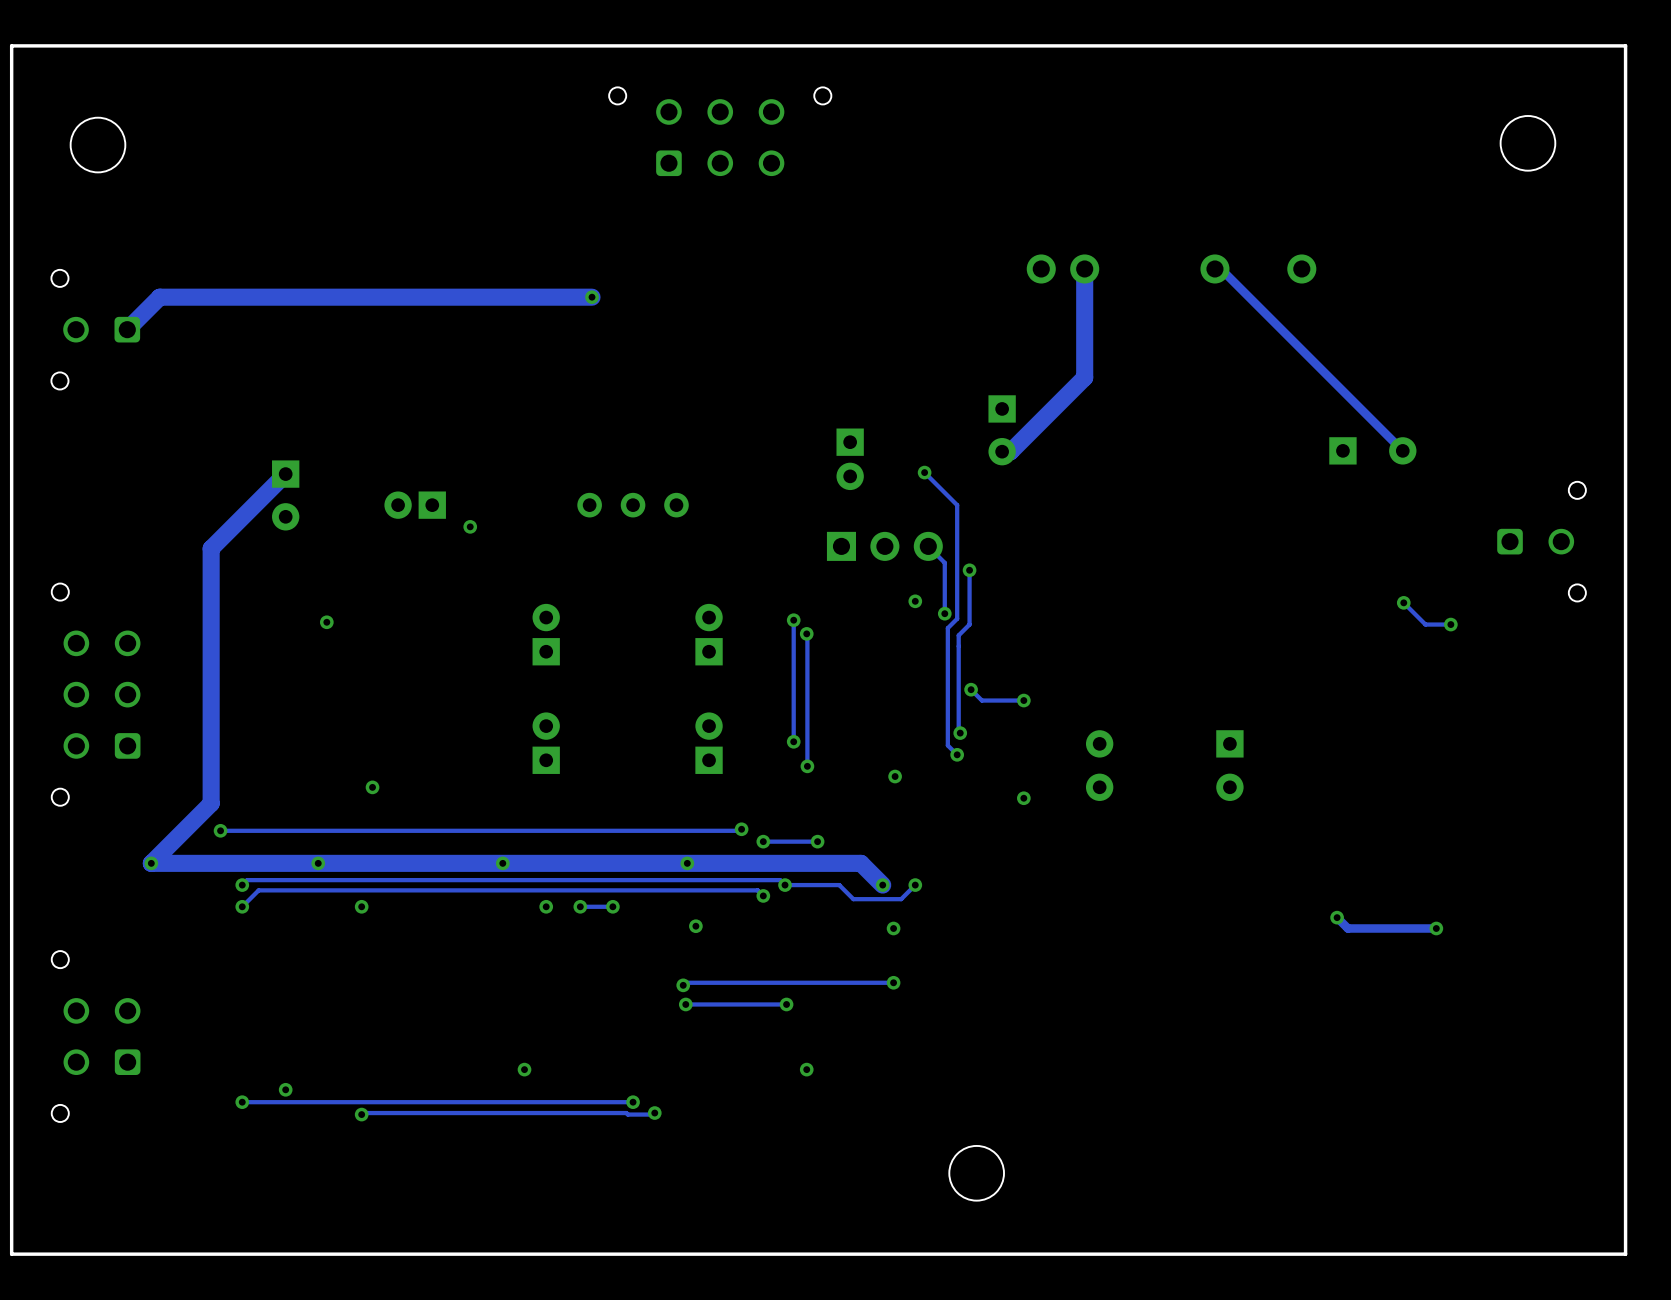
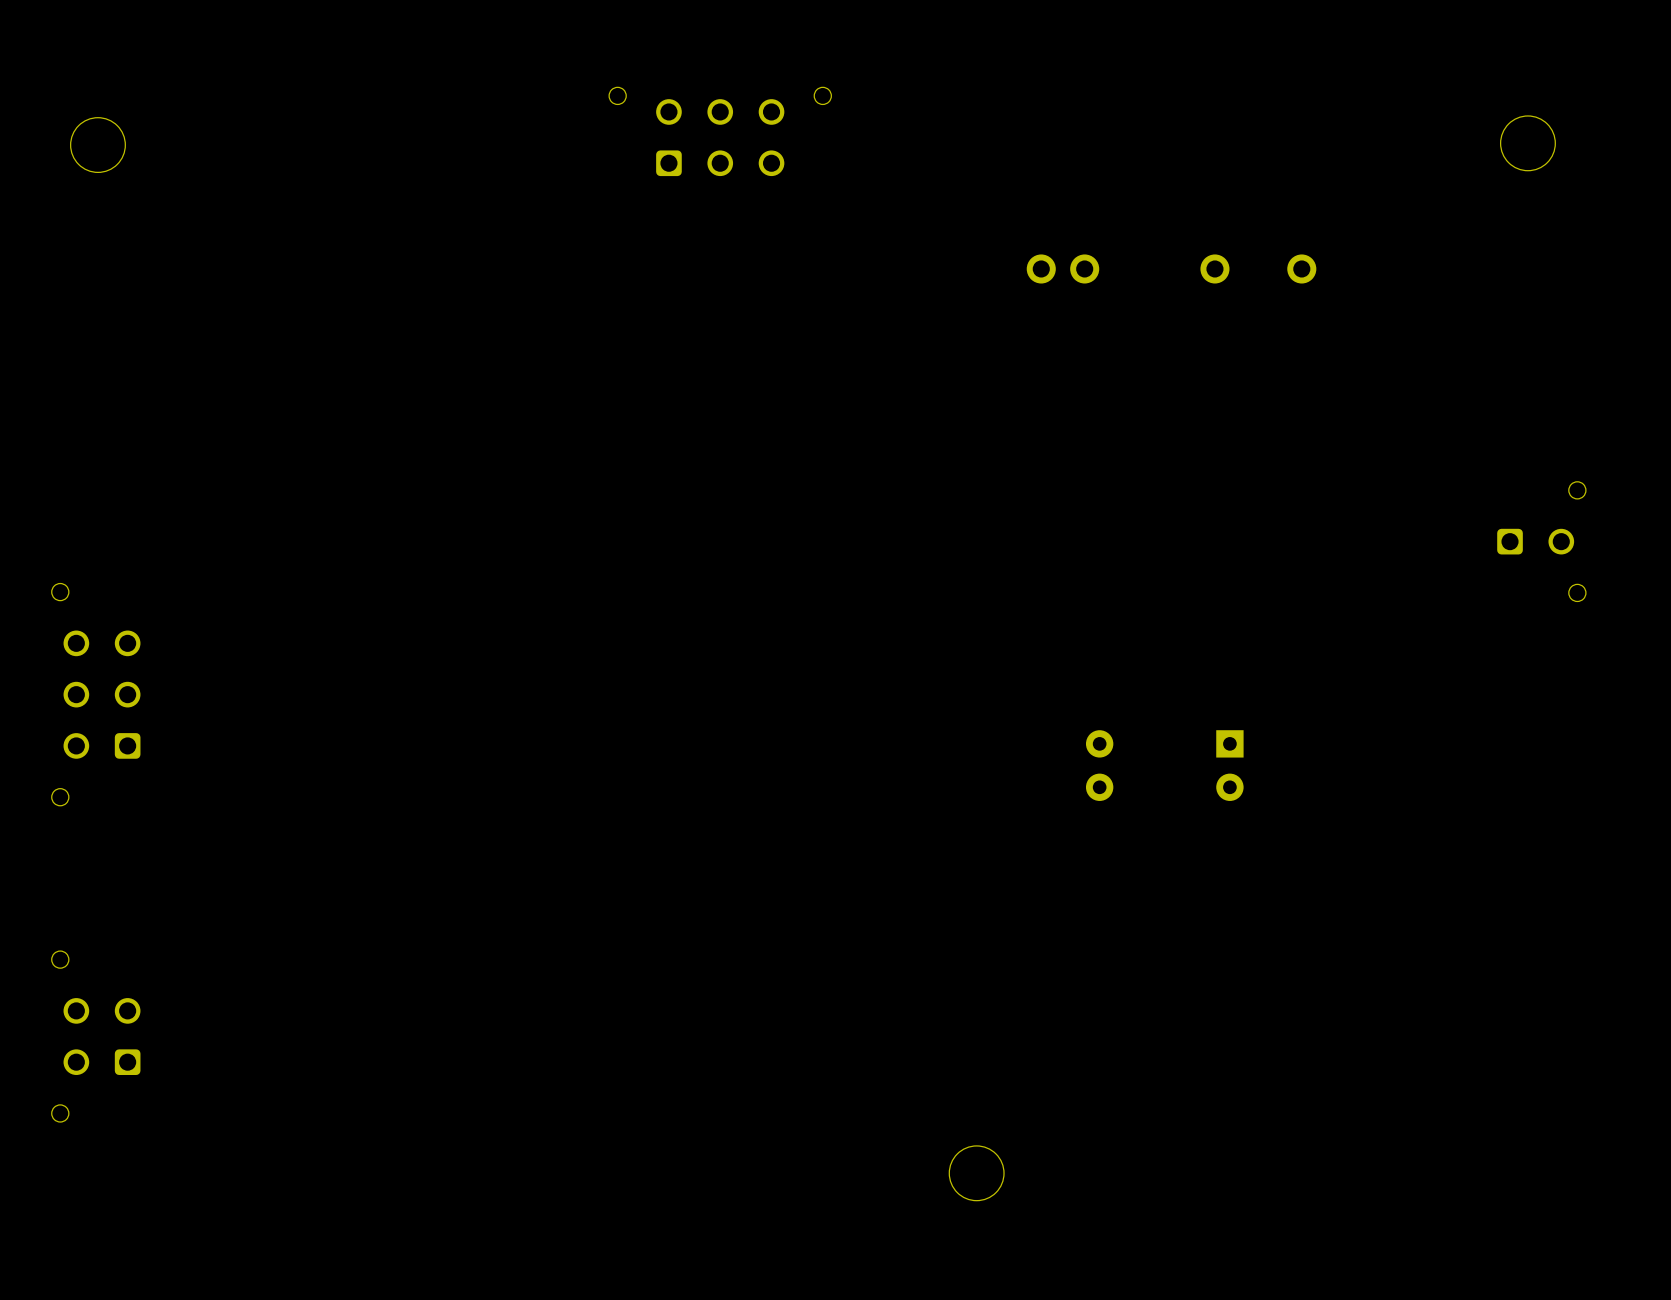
board edge: (1625, 45) (11, 45) (11, 1254) (1625, 1254) (1625, 45) -> none
track: (1084, 268) (1084, 377) (1010, 451) (1002, 451) -> none
track: (1214, 268) (1220, 268) (1402, 450) -> none
track: (592, 297) (159, 297) (127, 329) -> none
via: (592, 297) -> none
part: (95, 329) -> none
part: (1002, 430) -> none
part: (1372, 450) -> none
part: (850, 459) -> none
track: (924, 472) (957, 505) (957, 618) (947, 628) (947, 745) (957, 754) -> none
via: (924, 472) -> none
track: (285, 474) (211, 548) (211, 803) (151, 863) (861, 863) (882, 885) -> none
part: (285, 495) -> none
part: (415, 505) -> none
part: (633, 505) -> none
via: (470, 526) -> none
part: (884, 546) -> none
track: (928, 546) (944, 562) (944, 613) -> none
track: (969, 570) (969, 624) (958, 635) (958, 731) (960, 733) -> none
via: (969, 570) -> none
via: (915, 601) -> none
track: (1403, 602) (1425, 624) (1450, 624) -> none
via: (1403, 602) -> none
via: (944, 613) -> none
track: (793, 620) (793, 741) -> none
via: (793, 620) -> none
via: (326, 622) -> none
via: (1450, 624) -> none
track: (806, 633) (807, 766) -> none
via: (806, 633) -> none
part: (546, 634) -> none
part: (709, 634) -> none
track: (971, 689) (981, 700) (1023, 700) -> none
via: (971, 689) -> none
via: (1023, 700) -> none
via: (960, 733) -> none
via: (793, 741) -> none
part: (546, 743) -> none
part: (709, 743) -> none
via: (957, 754) -> none
via: (807, 766) -> none
via: (895, 776) -> none
via: (372, 787) -> none
via: (1023, 798) -> none
track: (741, 829) (740, 830) (220, 830) -> none
via: (741, 829) -> none
via: (220, 830) -> none
via: (763, 841) -> none
track: (817, 841) (763, 841) -> none
via: (817, 841) -> none
via: (151, 863) -> none
via: (318, 863) -> none
via: (502, 863) -> none
via: (687, 863) -> none
via: (242, 885) -> none
via: (785, 885) -> none
via: (882, 885) -> none
track: (915, 885) (901, 899) (853, 899) (839, 885) (785, 885) (780, 880) (247, 880) (242, 885) -> none
via: (915, 885) -> none
track: (763, 895) (757, 890) (258, 890) (242, 906) -> none
via: (763, 895) -> none
via: (242, 906) -> none
via: (361, 906) -> none
via: (546, 906) -> none
via: (580, 906) -> none
track: (612, 906) (580, 906) -> none
via: (612, 906) -> none
track: (1337, 917) (1347, 928) (1436, 928) -> none
via: (1337, 917) -> none
via: (695, 926) -> none
via: (893, 928) -> none
via: (1436, 928) -> none
track: (893, 982) (685, 982) (683, 985) -> none
via: (893, 982) -> none
via: (683, 985) -> none
via: (685, 1004) -> none
track: (786, 1004) (685, 1004) -> none
via: (786, 1004) -> none
via: (524, 1069) -> none
via: (806, 1069) -> none
via: (285, 1089) -> none
via: (242, 1102) -> none
track: (633, 1102) (242, 1102) -> none
via: (633, 1102) -> none
track: (654, 1113) (653, 1114) (626, 1113) (363, 1113) (361, 1114) -> none
via: (654, 1113) -> none
via: (361, 1114) -> none

